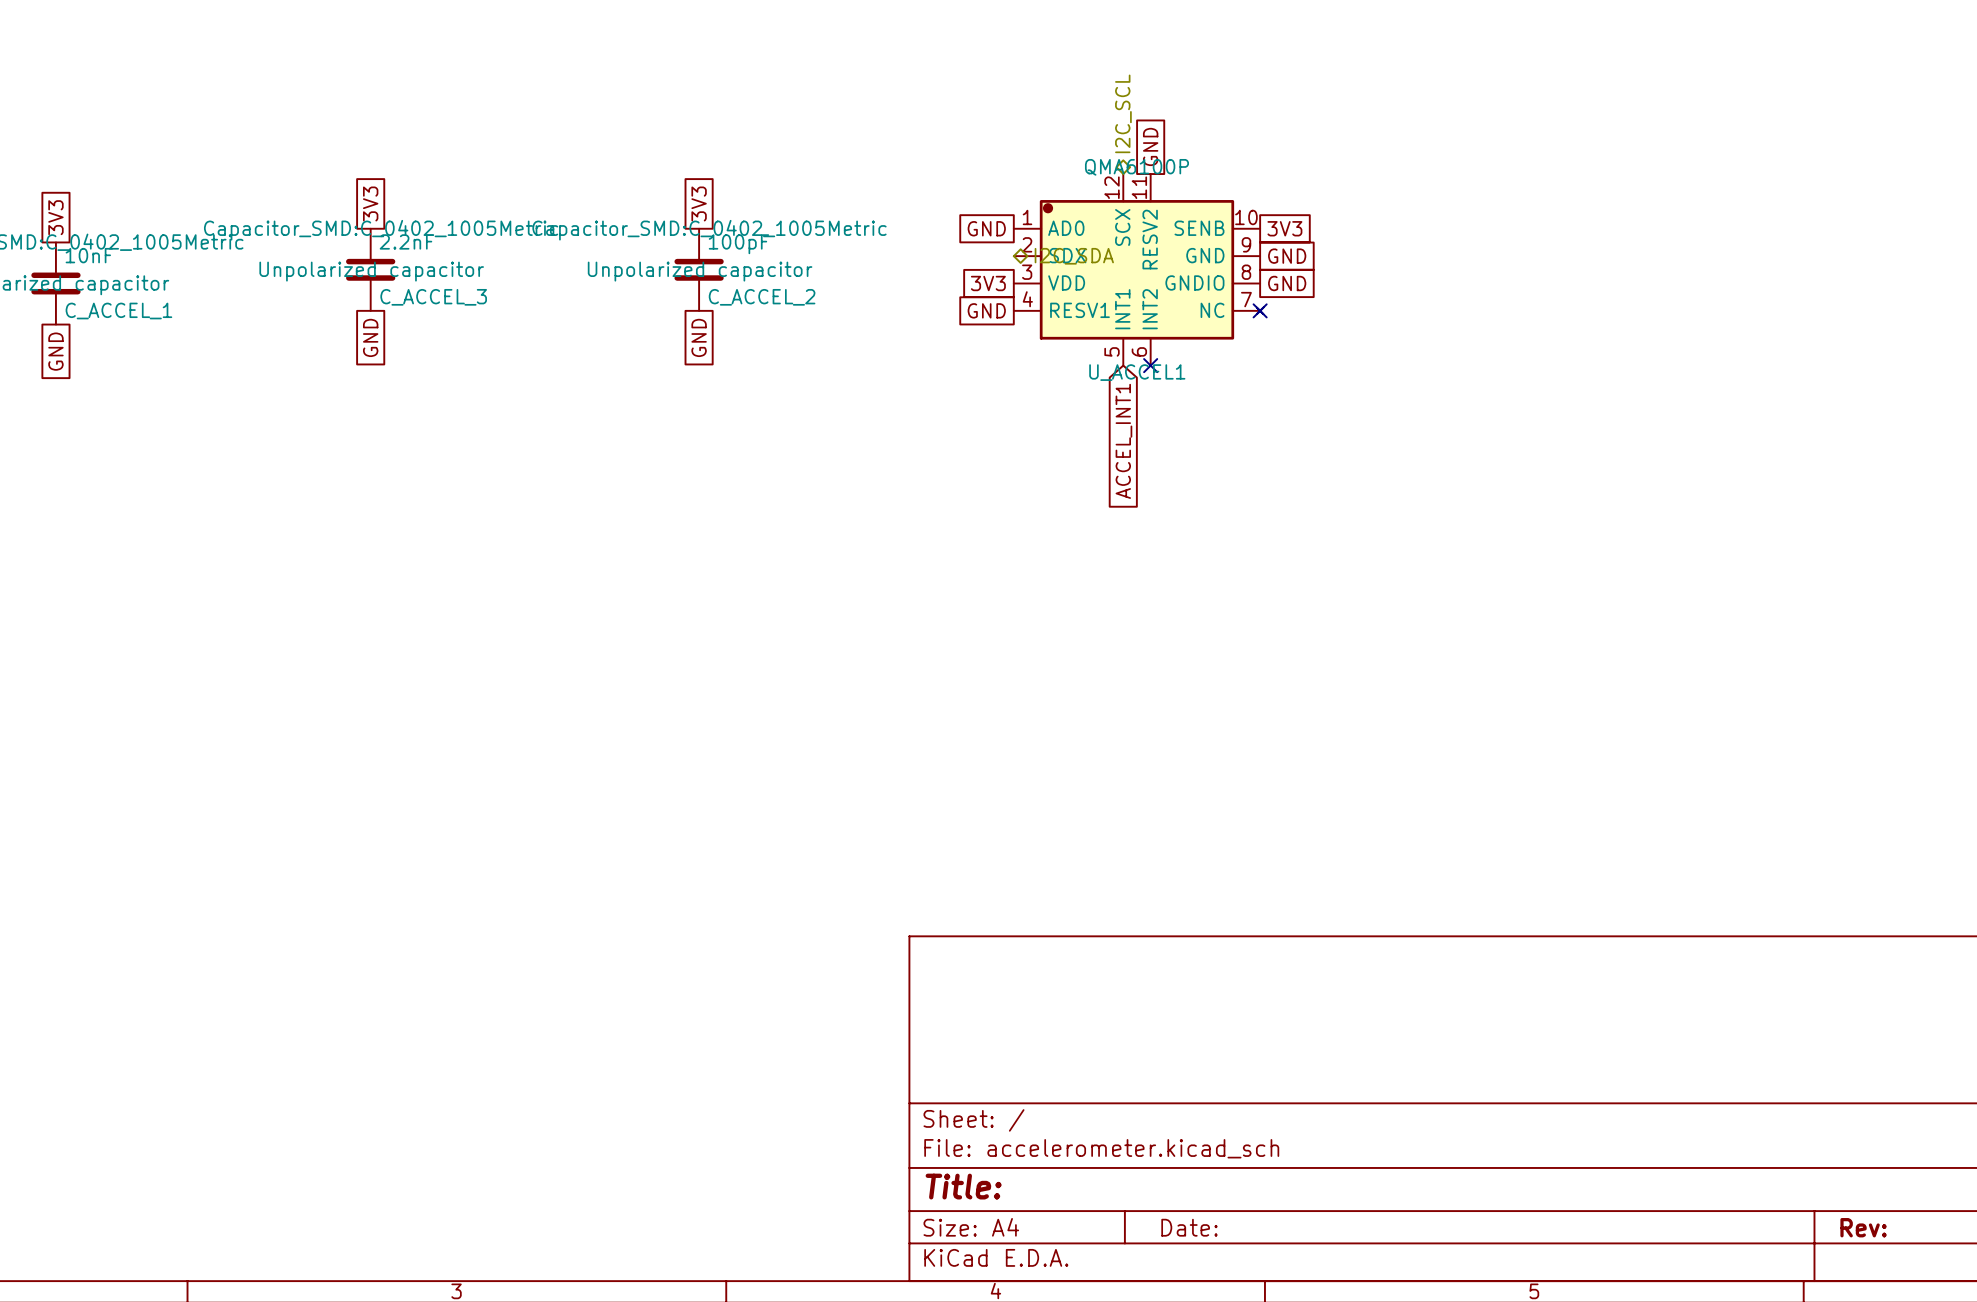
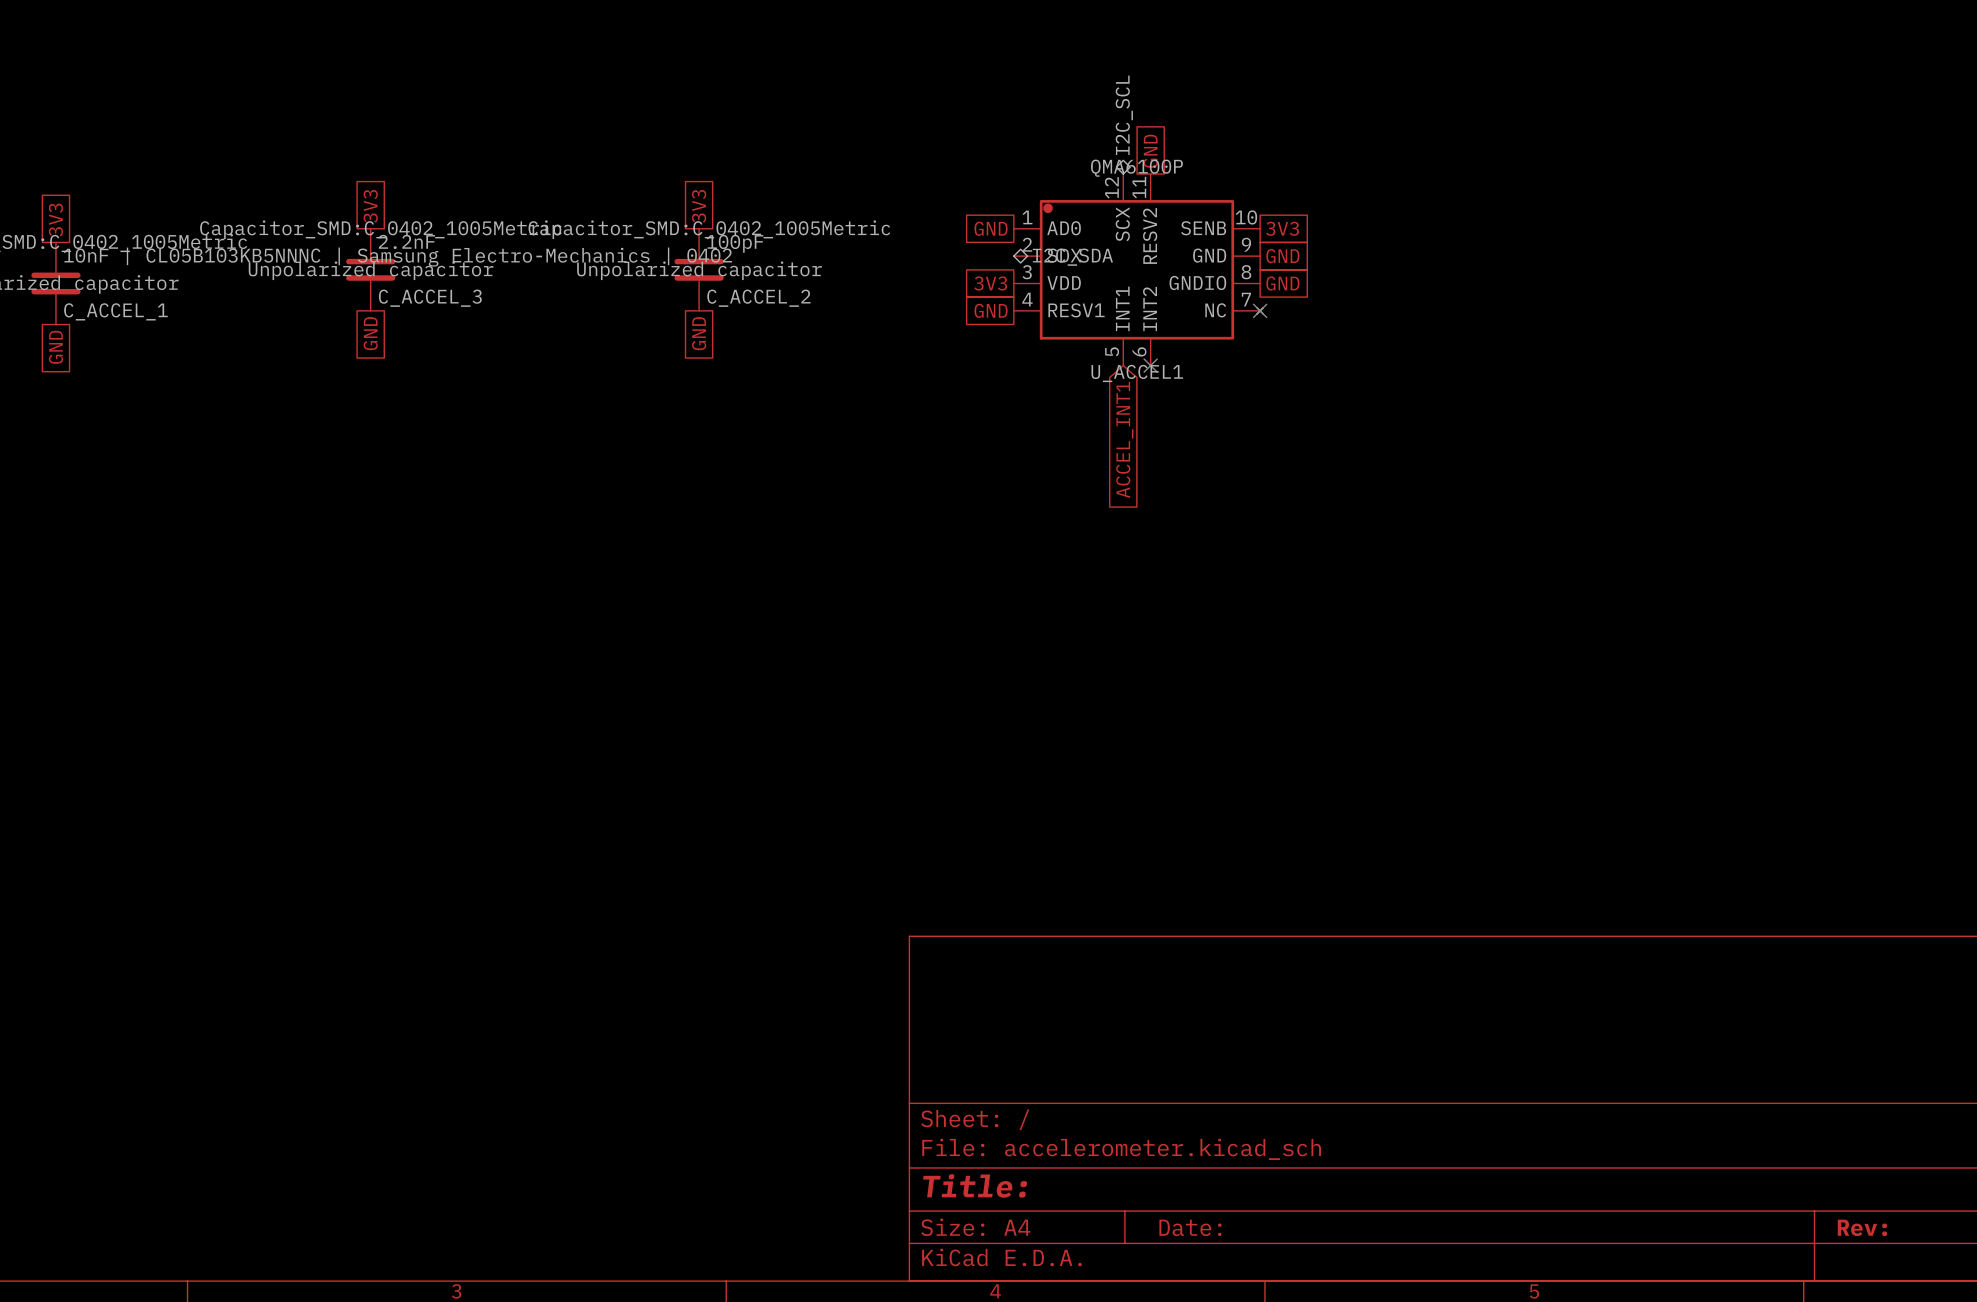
C_ACCEL_1 value: 10nF (89, 255) -> 10nF | CL05B103KB5NNNC | Samsung Electro-Mechanics | 0402 (397, 257)

